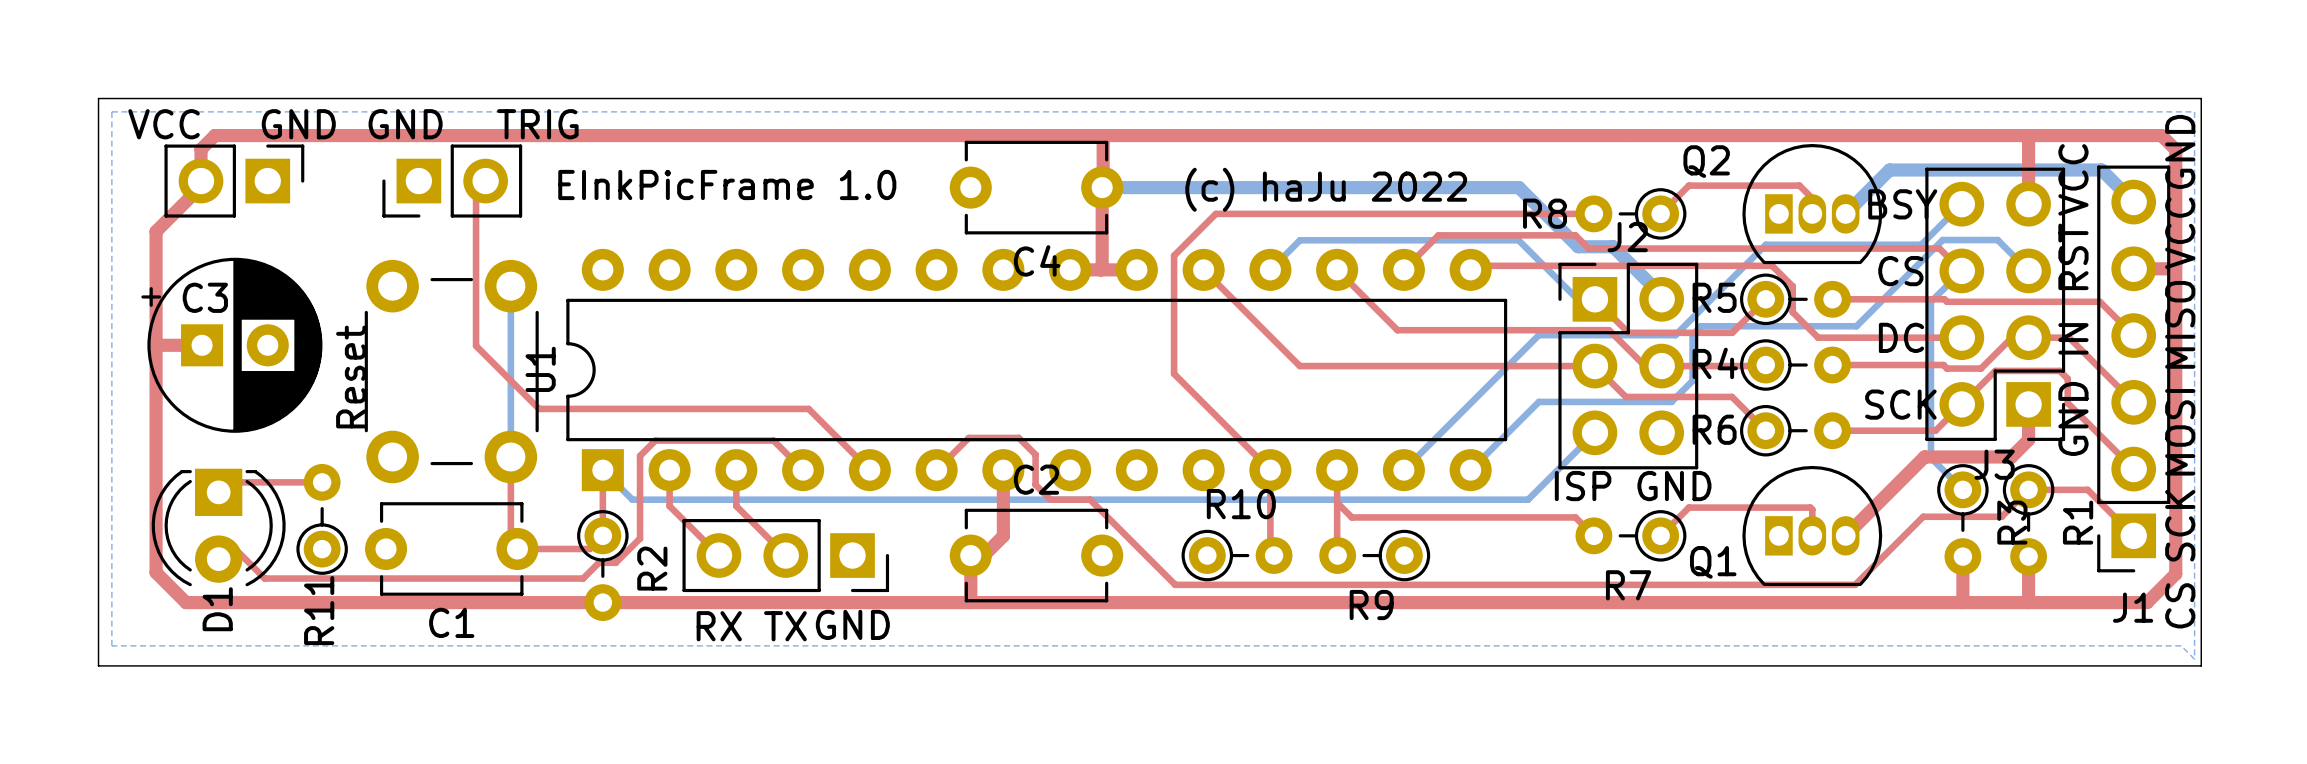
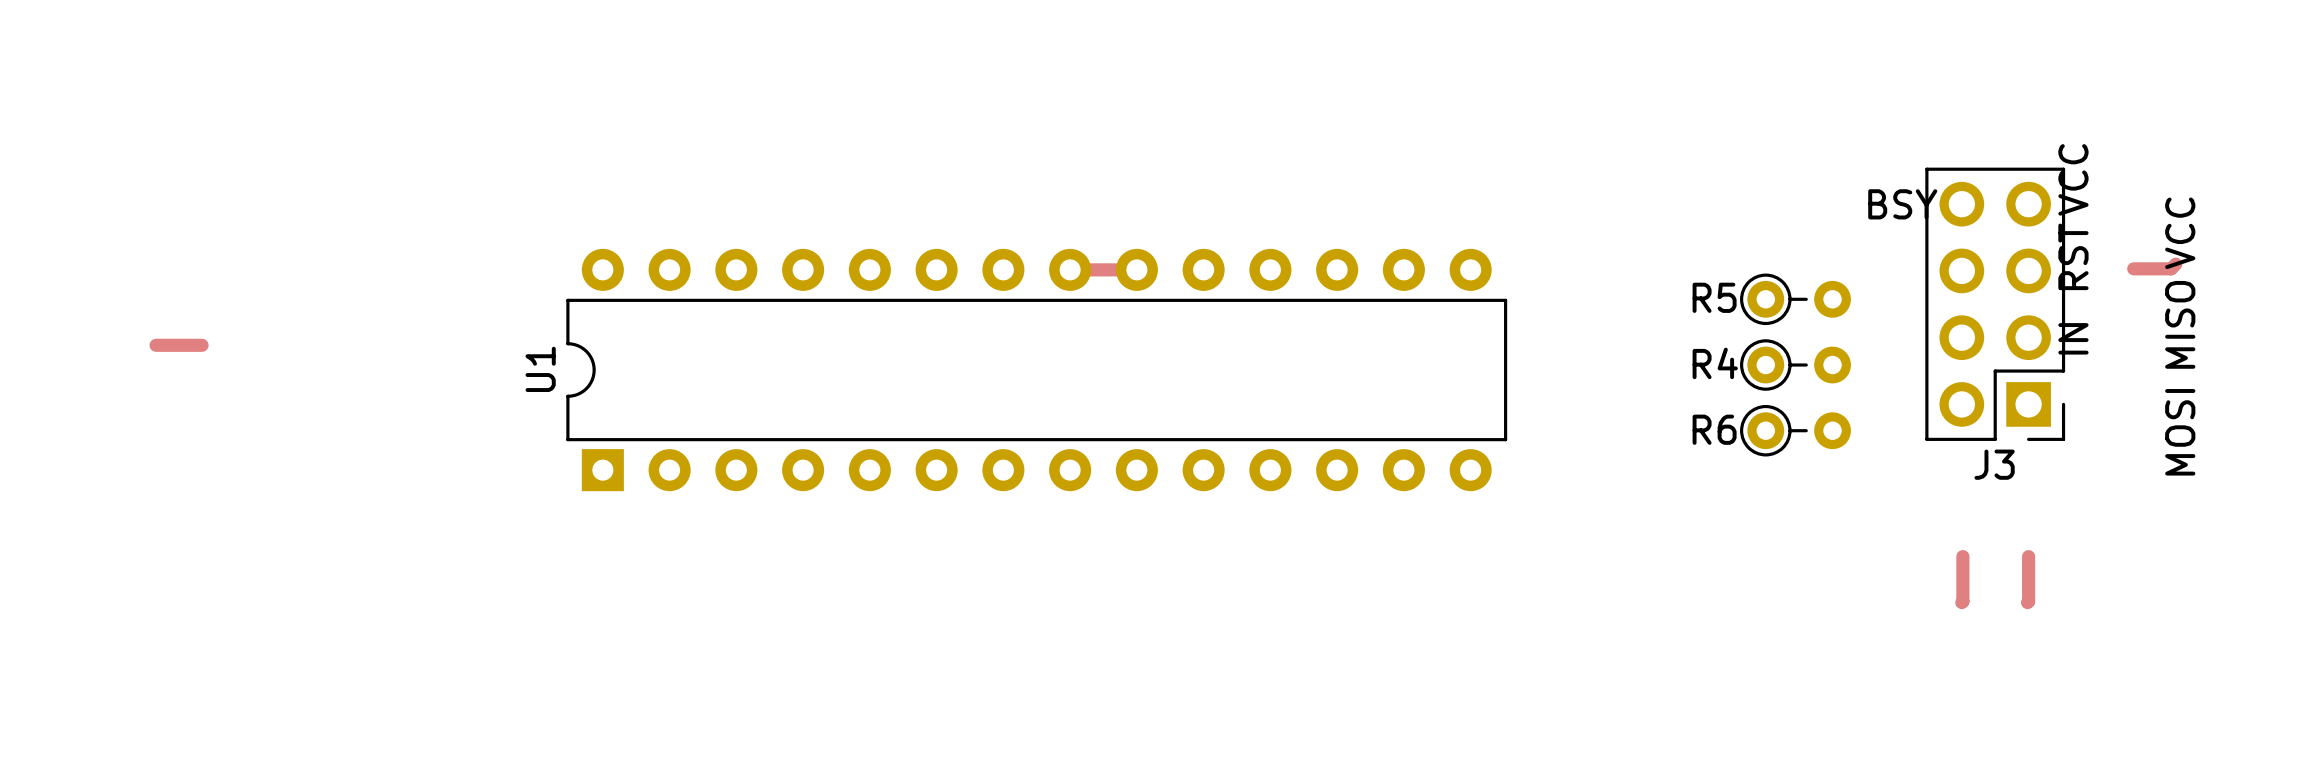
board edge: (98, 98) (2201, 98) (2201, 665) (98, 665) (98, 98) -> none
bottom zone outline: (111, 111) (111, 645) (2181, 645) (2194, 659) (2194, 111) (111, 111) -> none
text: VCC (164, 124) -> none
text: GND (298, 124) -> none
text: GND (405, 124) -> none
text: TRIG (537, 124) -> none
top track: (214, 135) (201, 149) (201, 186) (156, 231) (156, 572) (186, 602) (2147, 602) (2175, 573) (2175, 149) (2161, 135) (214, 135) -> none
top track: (1103, 135) (1100, 269) -> none
top track: (2030, 135) (2028, 137) (2028, 204) -> none
text: GND (2180, 151) -> none
part: (234, 181) -> none
part: (452, 181) -> none
top track: (485, 181) (476, 190) (476, 345) (539, 408) (808, 408) (869, 470) -> none
text: EInkPicFrame 1.0 (727, 184) -> none
C4: (1036, 187) -> none
bottom track: (1102, 187) (1519, 187) (1578, 246) (1613, 246) (1661, 295) (1661, 299) -> none
text: (c) haJu 2022 (1326, 189) -> none
bottom track: (2133, 202) (2101, 170) (1889, 170) (1845, 213) -> none
Q2: (1812, 204) -> none
bottom track: (1961, 204) (1921, 244) (1765, 244) (1675, 335) (1538, 335) (1403, 470) -> none
top track: (1593, 213) (1215, 213) (1174, 255) (1174, 373) (1270, 470) (1270, 551) (1274, 555) -> none
R8: (1630, 213) -> none
top track: (1660, 213) (1688, 185) (1799, 185) (1812, 198) (1812, 213) -> none
top track: (1203, 269) (1299, 366) (1594, 366) (1625, 396) (1732, 396) (1765, 430) -> none
bottom track: (1270, 269) (1299, 240) (1518, 240) (1577, 299) (1594, 299) -> none
top track: (1337, 269) (1397, 330) (1609, 330) (1644, 366) (1765, 365) -> none
top track: (1403, 269) (1438, 235) (1575, 235) (1588, 248) (1939, 248) (1961, 270) -> none
top track: (1470, 269) (1474, 265) (1772, 265) (1792, 286) (1792, 312) (1818, 337) (1961, 337) -> none
bottom track: (1961, 270) (1930, 301) (1930, 457) (1962, 489) -> none
bottom track: (2028, 270) (1997, 240) (1942, 240) (1856, 326) (1701, 326) (1692, 334) (1692, 380) (1671, 401) (1538, 401) (1470, 470) -> none
text: CS (1900, 271) -> none
bottom track: (510, 286) (510, 456) -> none
top track: (1594, 299) (1628, 332) (1732, 332) (1765, 299) -> none
top track: (1832, 299) (2099, 301) (2133, 335) -> none
text: DC (1901, 337) -> none
C3: (231, 345) -> none
top track: (1832, 365) (1943, 365) (1947, 368) (1980, 368) (2011, 337) (2069, 337) (2133, 402) -> none
J2: (1628, 366) -> none
J1: (2133, 368) -> none
part: (451, 371) -> none
text: Reset (351, 377) -> none
text: SCK (1900, 404) -> none
top track: (2028, 404) (2028, 439) (2011, 456) (1924, 456) (1845, 535) -> none
text: GND (2073, 418) -> none
top track: (1832, 430) (1935, 430) (1995, 370) (2059, 370) (2067, 378) (2067, 403) (2133, 469) -> none
bottom track: (1594, 432) (1528, 499) (632, 499) (602, 470) -> none
top track: (510, 456) (510, 542) (517, 548) (589, 548) (602, 535) (602, 470) -> none
top track: (669, 470) (669, 506) (719, 555) -> none
top track: (736, 470) (736, 506) (785, 555) -> none
top track: (803, 470) (773, 440) (655, 440) (640, 455) (640, 538) (615, 562) (598, 562) (583, 578) (264, 578) (235, 549) -> none
top track: (936, 470) (968, 437) (1018, 437) (1035, 454) (1035, 484) (1050, 499) (1090, 499) (1175, 584) (1855, 584) (1923, 516) (2001, 516) (2028, 489) (2087, 489) (2133, 535) -> none
top track: (1003, 470) (1003, 536) (983, 555) (970, 555) (969, 602) -> none
top track: (1337, 470) (1337, 555) -> none
top track: (235, 482) (322, 482) -> none
text: ISP GND (1633, 486) -> none
top track: (1337, 502) (1351, 517) (1575, 517) (1593, 535) -> none
R11: (322, 519) -> none
R3: (1962, 519) -> none
R1: (2028, 519) -> none
Q1: (1812, 525) -> none
text: SCK (2180, 525) -> none
D1: (218, 527) -> none
R7: (1630, 535) -> none
top track: (1660, 535) (1688, 507) (1810, 507) (1812, 509) (1812, 535) -> none
C1: (451, 548) -> none
part: (785, 555) -> none
C2: (1036, 555) -> none
R10: (1237, 555) -> none
R9: (1374, 555) -> none
R2: (602, 565) -> none
text: CS (2180, 605) -> none
text: GND (852, 624) -> none
text: RX (719, 626) -> none
text: TX (785, 626) -> none

